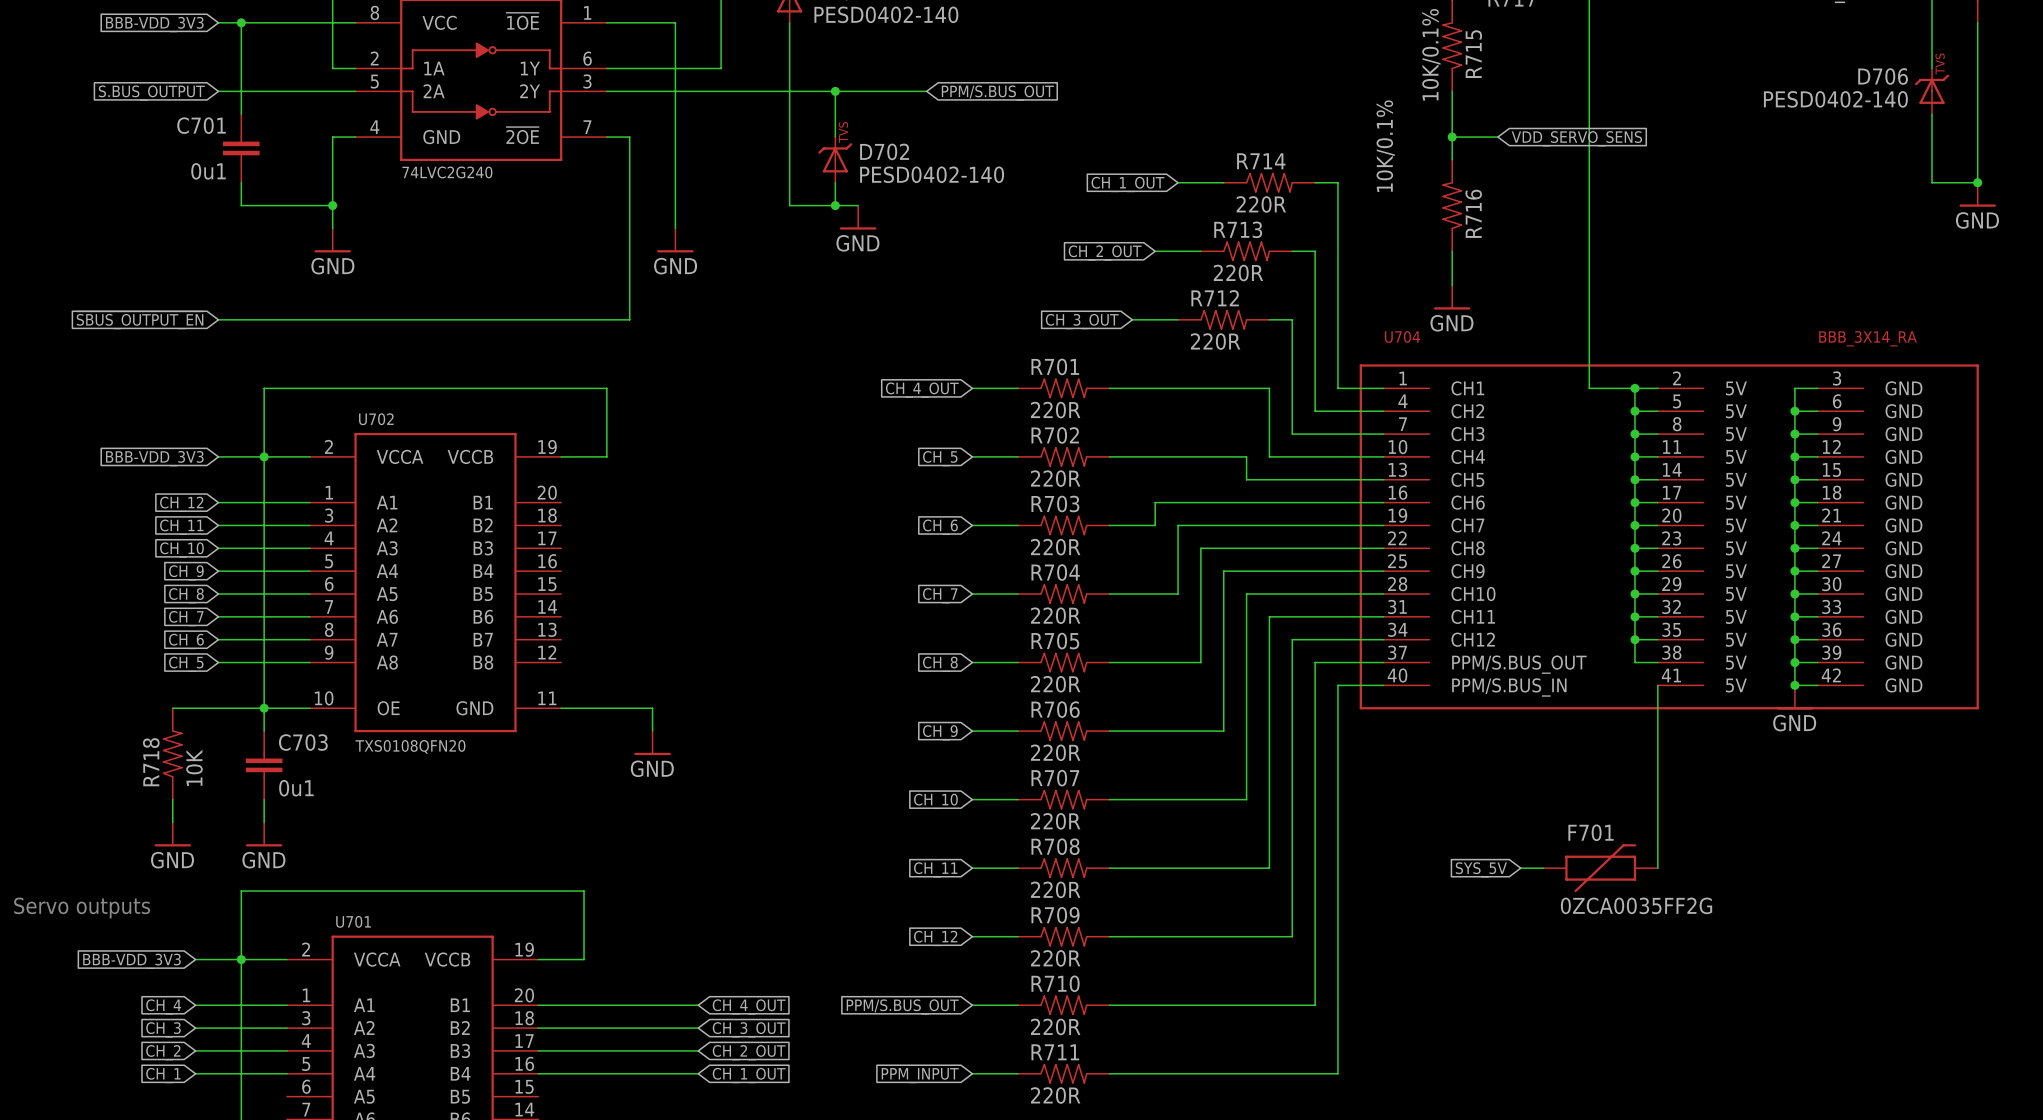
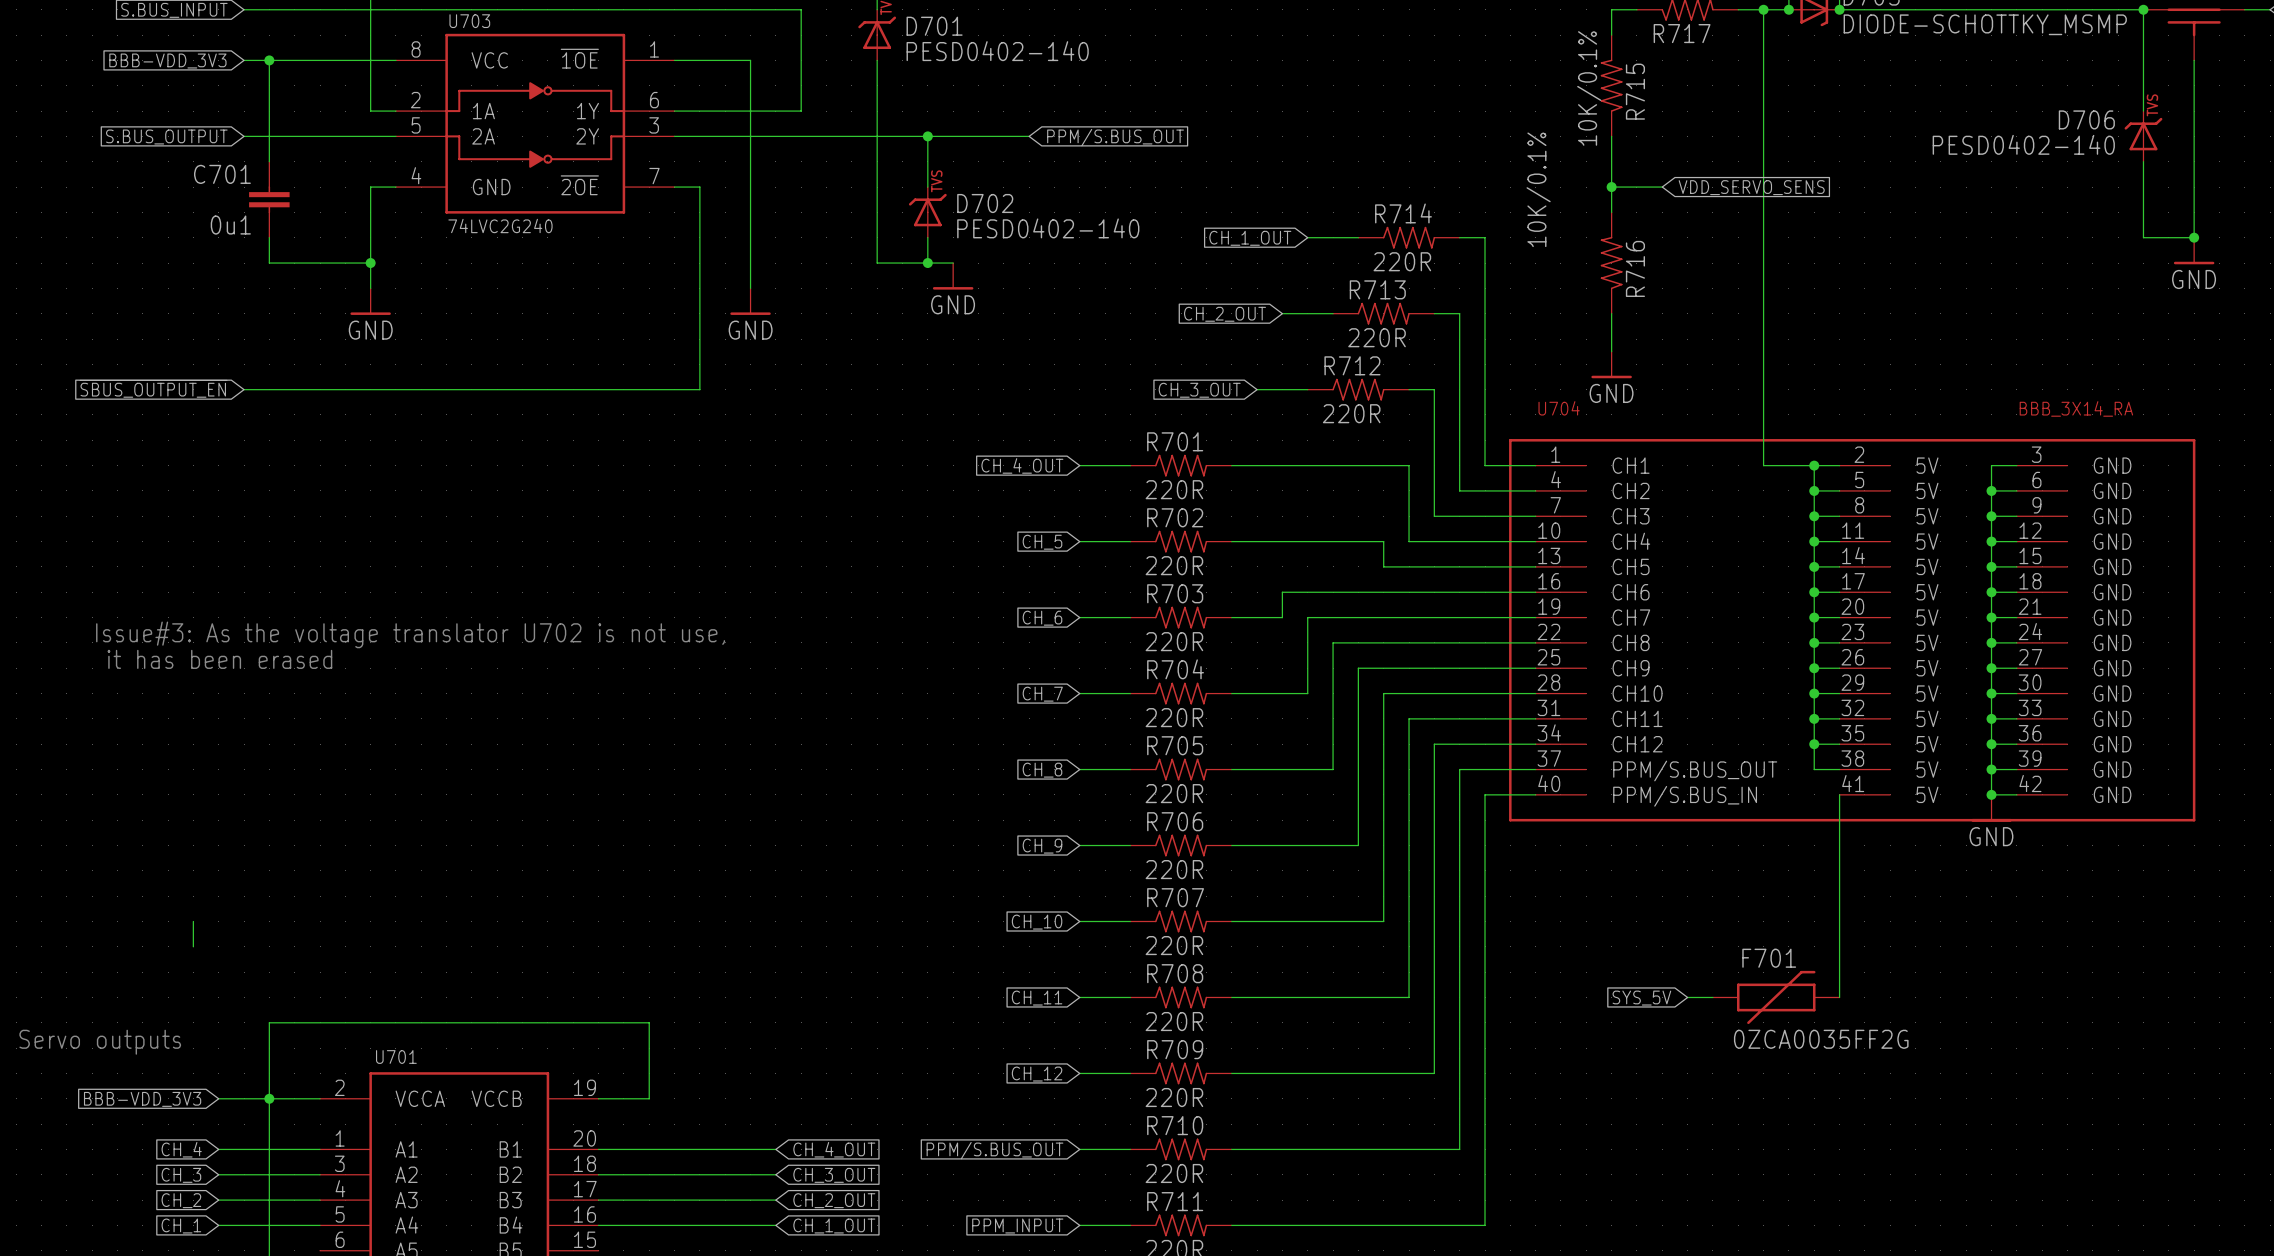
wire: (218, 456) (309, 456) -> none
junction: (264, 456) -> none
wire: (561, 456) (606, 456) (606, 388) (264, 388) (264, 731) -> none
global label: BBB-VDD_3V3 (154, 458) -> none
wire: (218, 502) (309, 502) -> none
global label: CH_12 (181, 504) -> none
wire: (218, 525) (309, 525) -> none
global label: CH_11 (181, 527) -> none
text: none -> Issue#3: As the voltage translator U702 is not use, (410, 634)
wire: (218, 548) (309, 548) -> none
global label: CH_10 (181, 550) -> none
text: none -> it has been erased (219, 659)
wire: (218, 571) (309, 571) -> none
global label: CH_9 (186, 572) -> none
U702: TXS0108QFN20 (435, 582) -> none
wire: (218, 594) (309, 594) -> none
global label: CH_8 (186, 595) -> none
wire: (218, 616) (309, 616) -> none
global label: CH_7 (186, 618) -> none
wire: (218, 639) (309, 639) -> none
global label: CH_6 (186, 641) -> none
wire: (218, 662) (309, 662) -> none
global label: CH_5 (186, 664) -> none
wire: (172, 708) (309, 708) -> none
junction: (264, 708) -> none
wire: (561, 708) (652, 708) (652, 731) -> none
power symbol: GND (652, 743) -> none
R718: 10K (172, 753) -> none
C703: 0u1 (264, 765) -> none
wire: (264, 799) (264, 822) -> none
power symbol: GND (172, 834) -> none
power symbol: GND (264, 834) -> none

